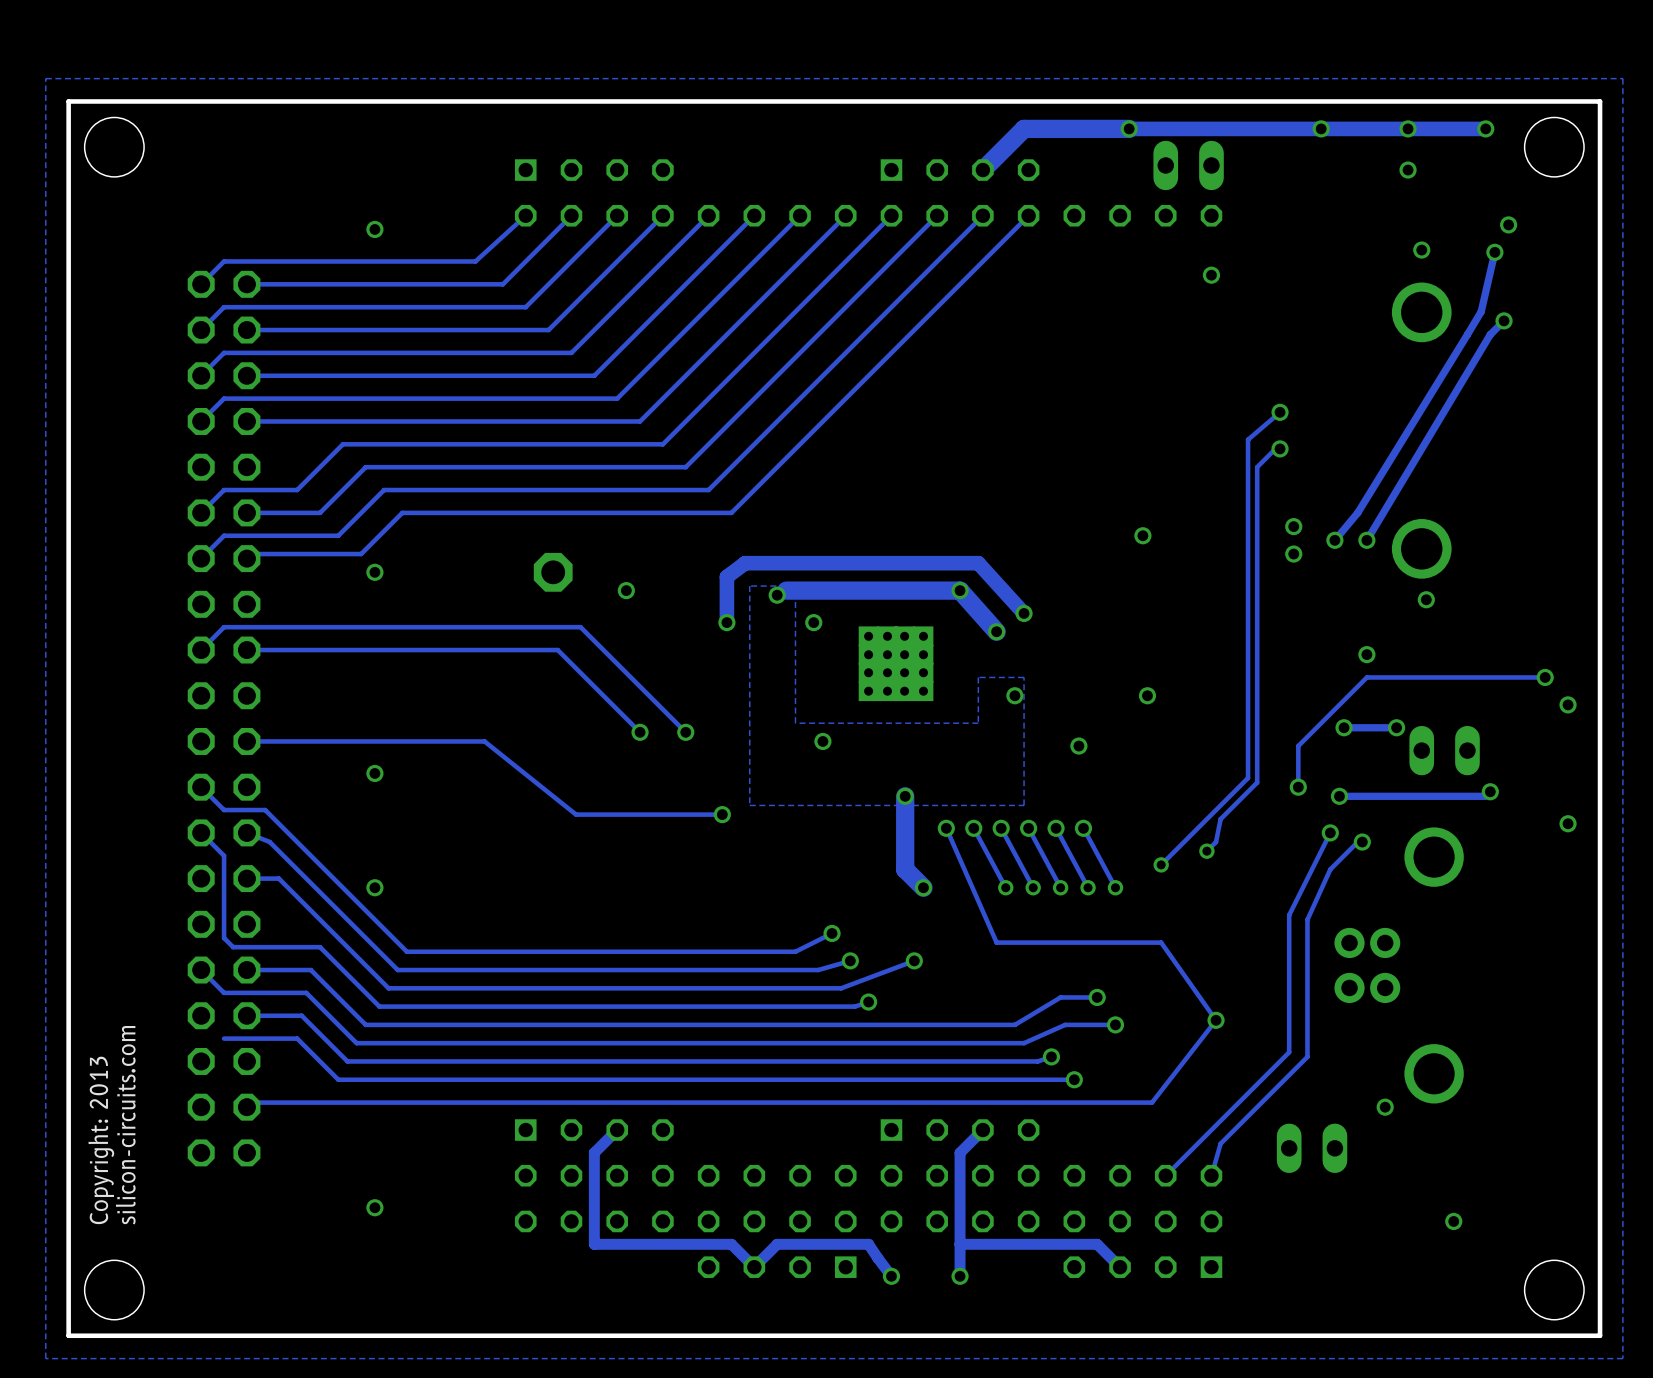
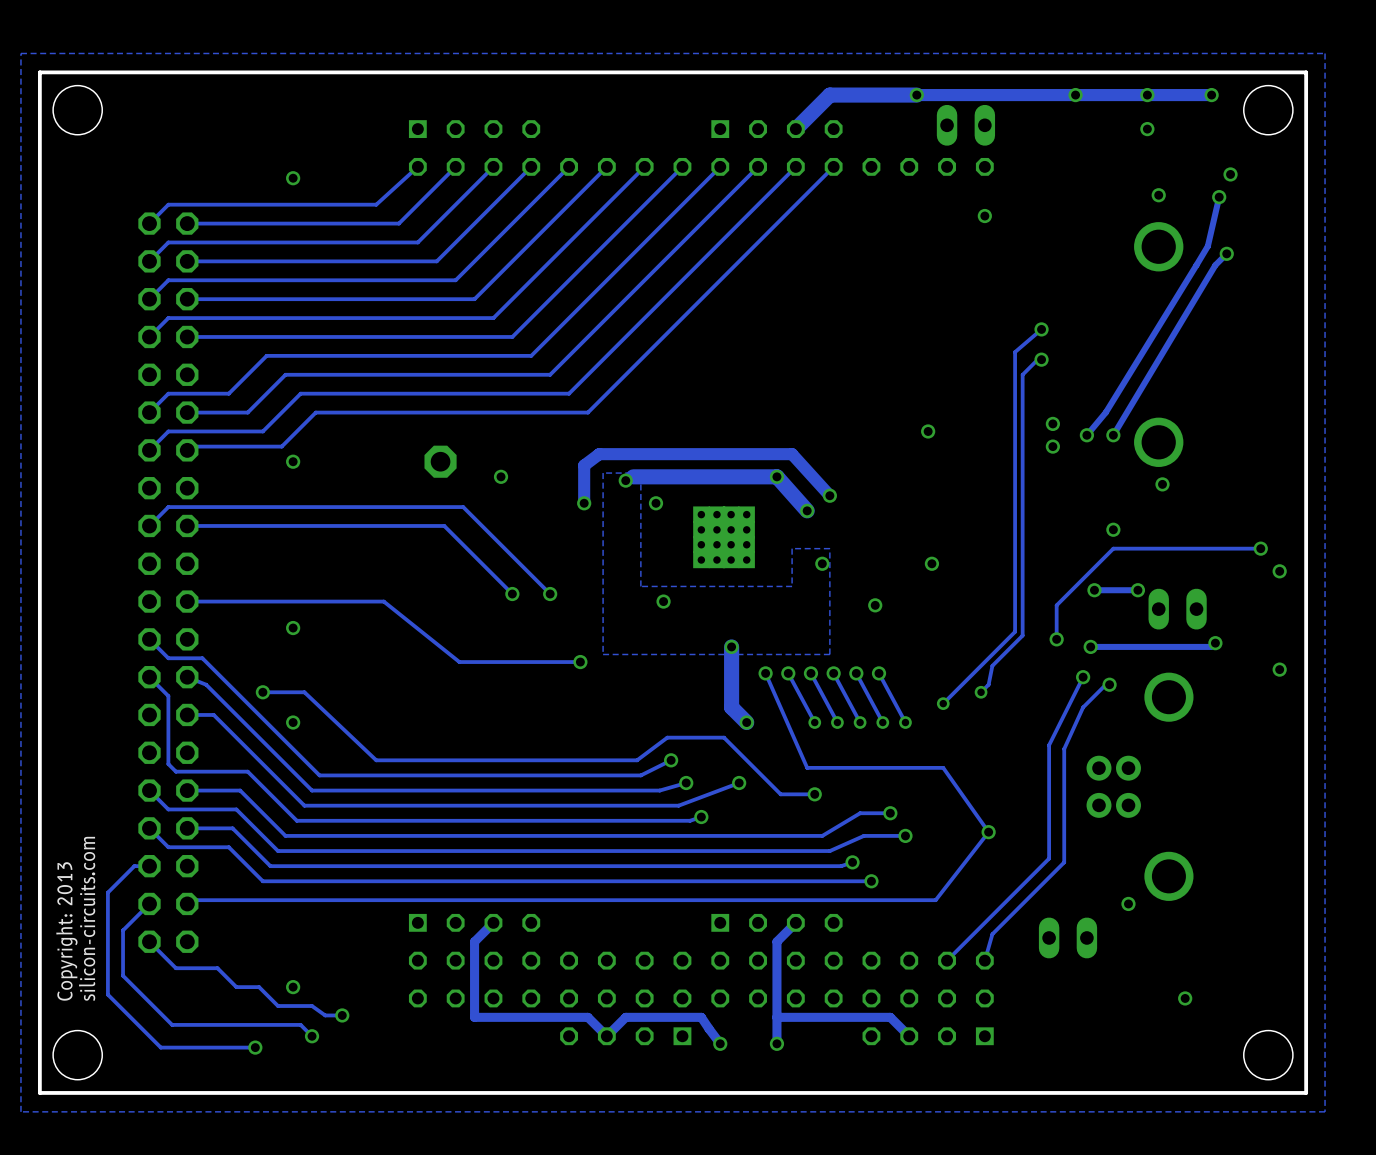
track: none -> (262, 692) (304, 692) (376, 760) (637, 760) (667, 737) (724, 737) (780, 794) (814, 794)
via: none -> (262, 692)
via: none -> (814, 794)
track: none -> (149, 828) (168, 847)
track: none -> (149, 866) (134, 866) (107, 892) (107, 994) (160, 1047) (255, 1047)
track: none -> (149, 903) (123, 930) (123, 975) (172, 1024) (300, 1024) (312, 1036)
track: none -> (149, 941) (175, 968) (217, 968) (236, 987) (259, 987) (278, 1006) (312, 1006) (325, 1015) (342, 1015)
via: none -> (342, 1015)
via: none -> (312, 1036)
via: none -> (255, 1047)

